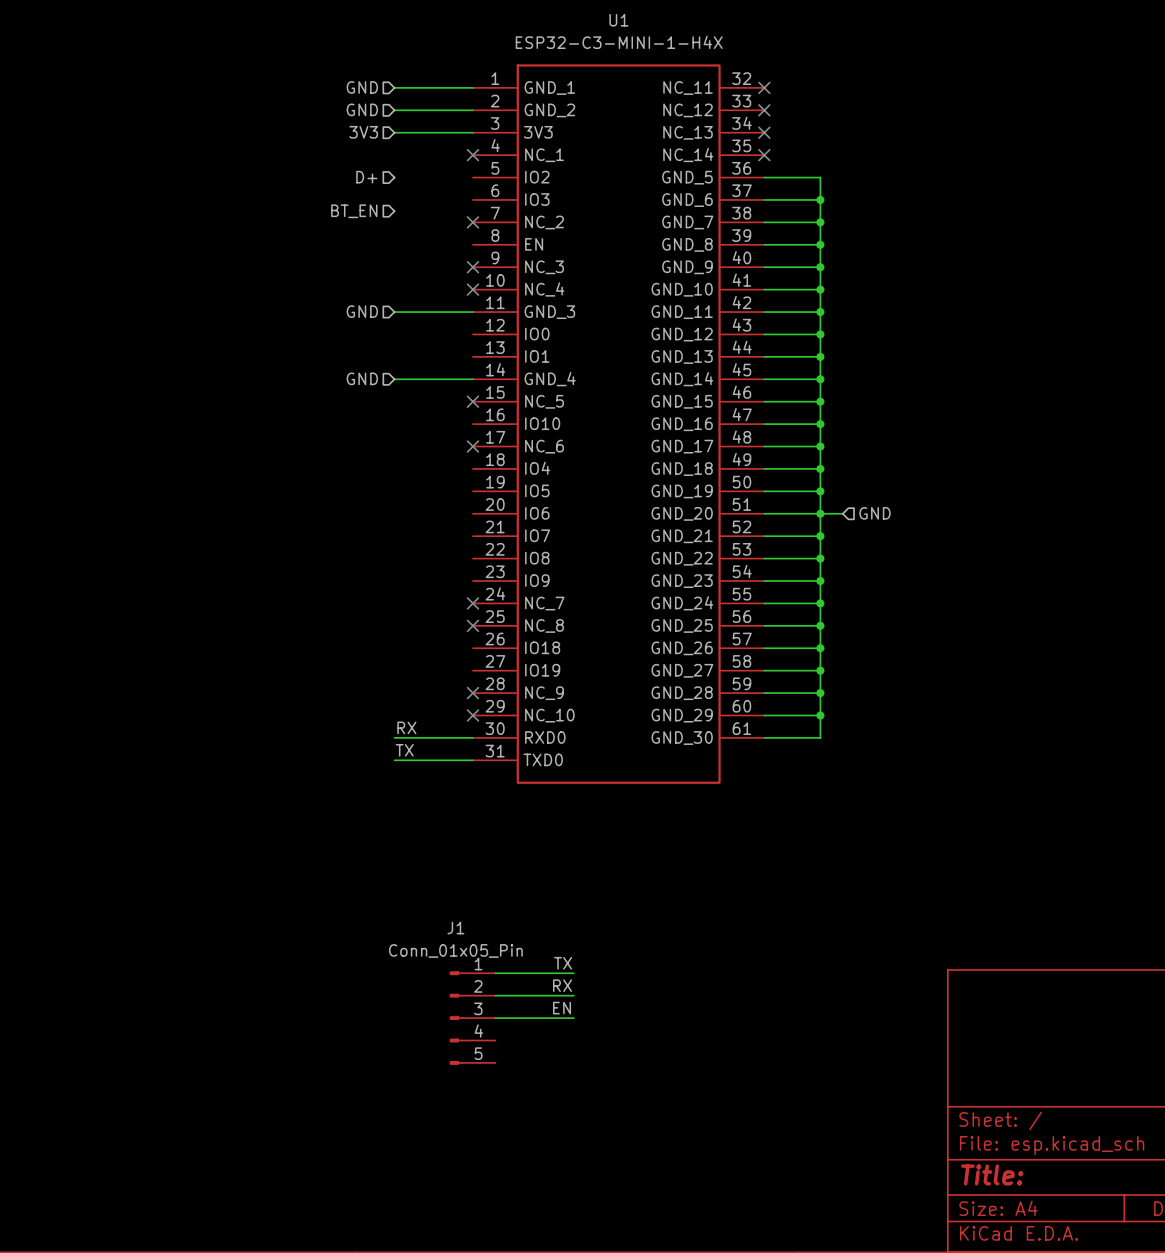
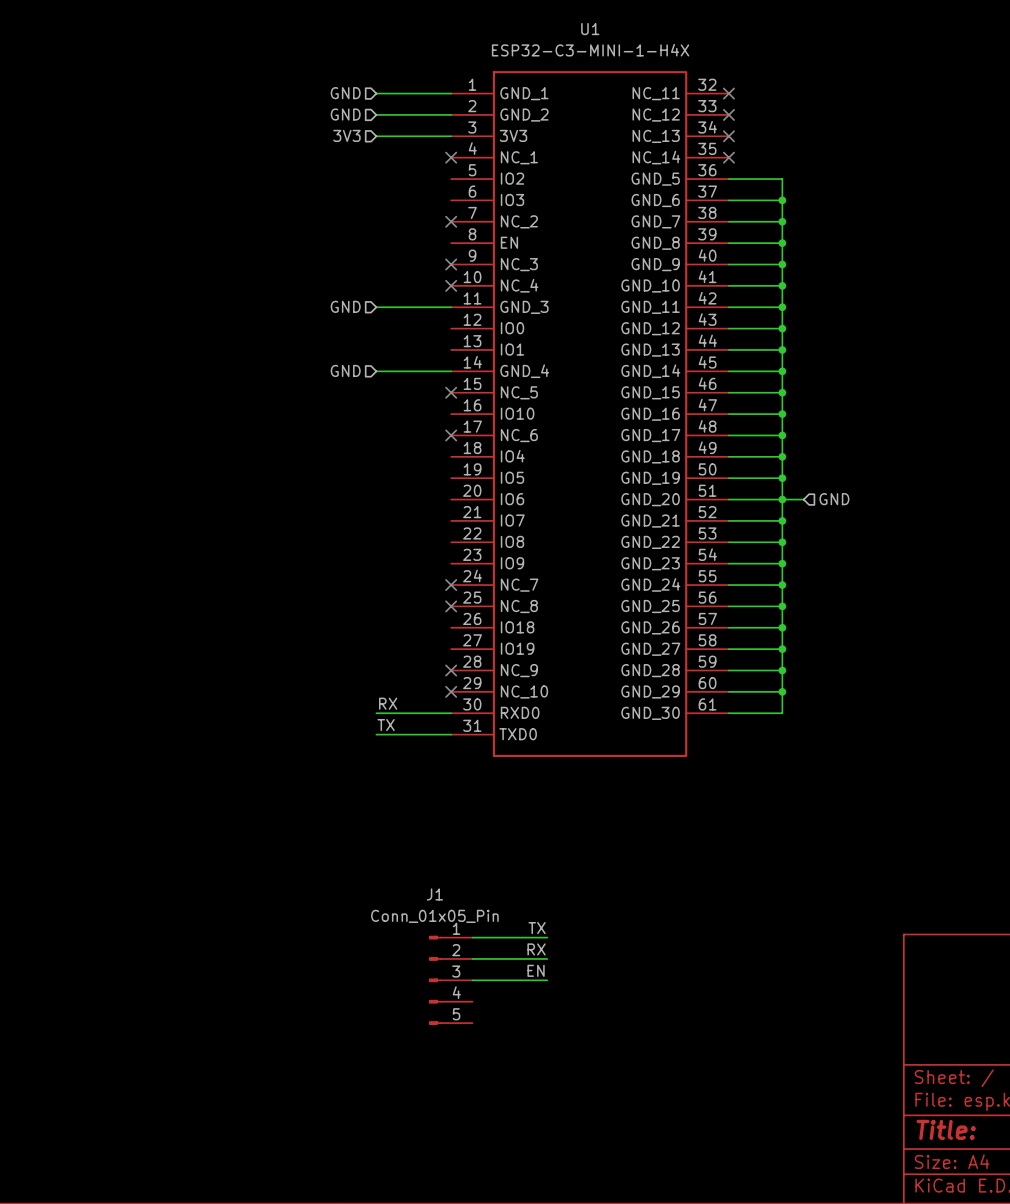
hierarchical label: D+ (366, 177) -> none
hierarchical label: BT_EN (354, 211) -> none

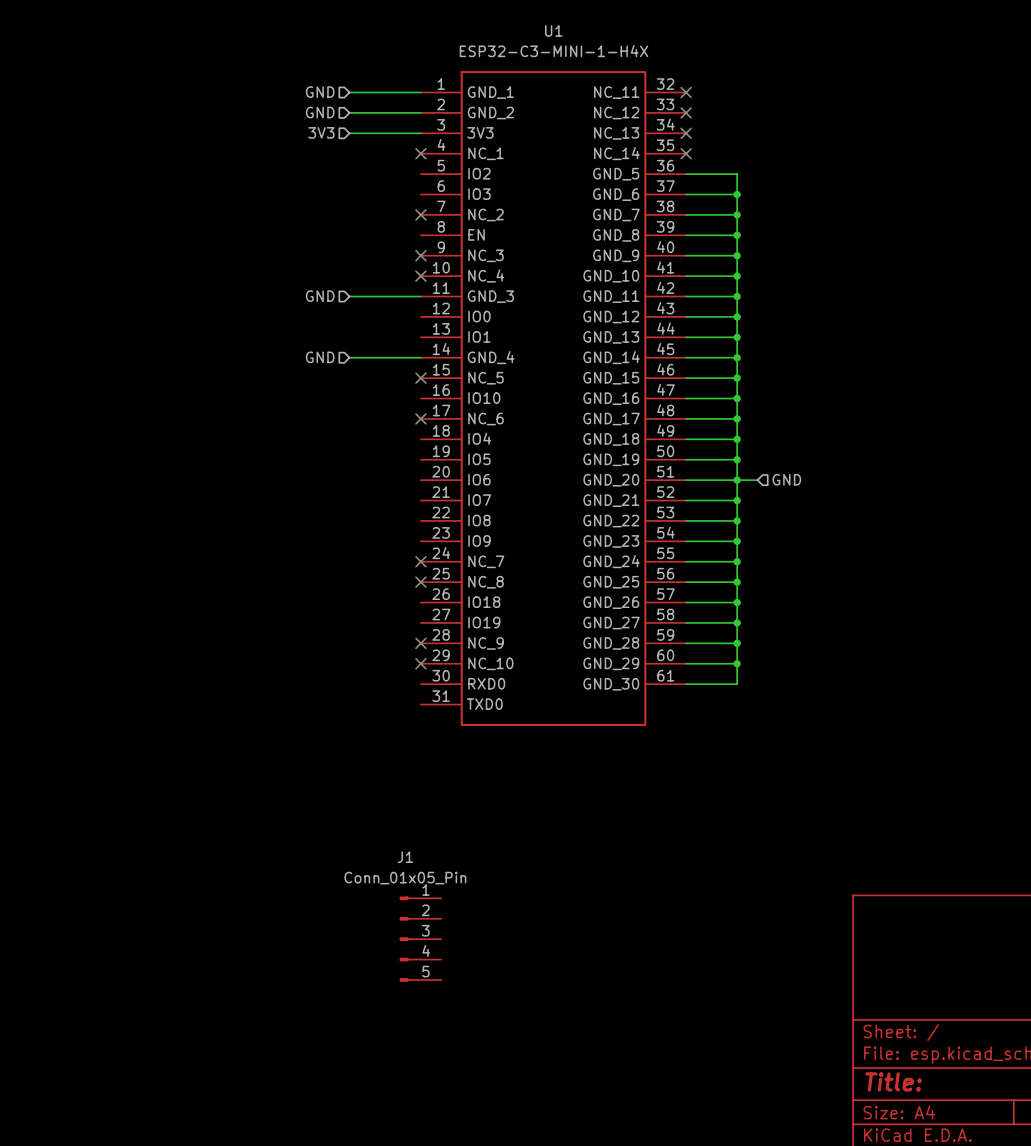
label: RX (388, 703) -> none
wire: (376, 713) (451, 713) -> none
label: TX (386, 725) -> none
wire: (376, 734) (451, 734) -> none
label: TX (537, 928) -> none
wire: (472, 937) (547, 937) -> none
label: RX (536, 949) -> none
wire: (472, 958) (547, 958) -> none
label: EN (536, 970) -> none
wire: (472, 980) (547, 980) -> none

